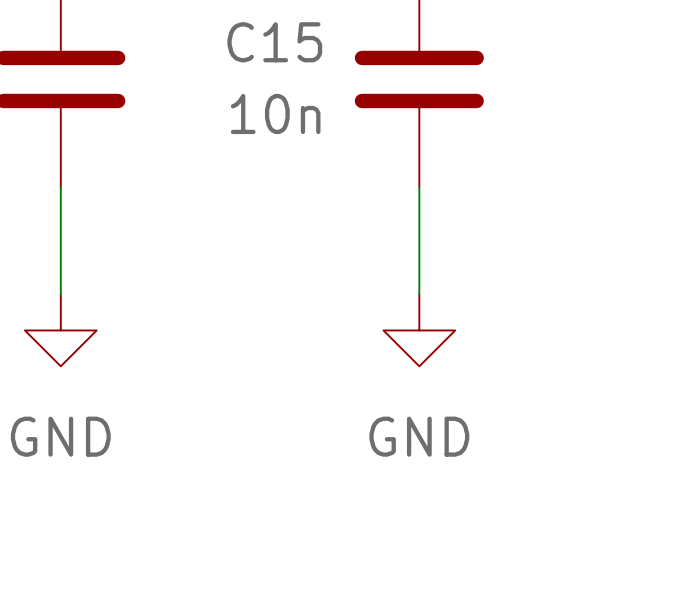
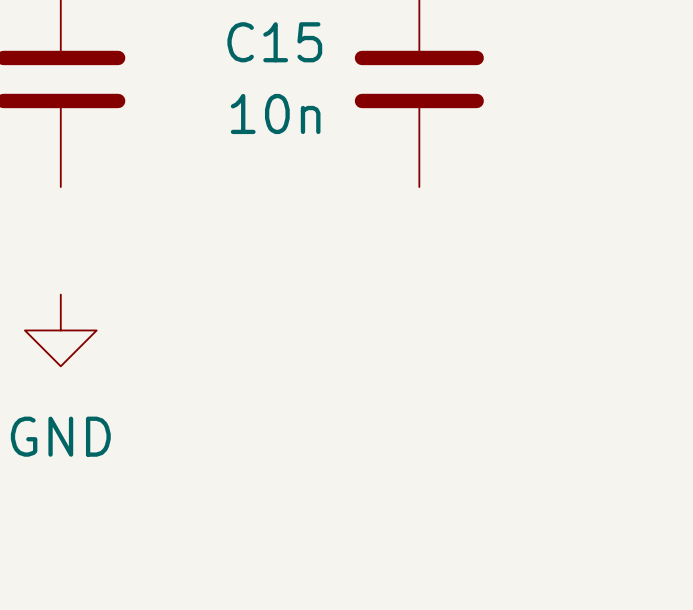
wire: (60, 187) (60, 294) -> none
wire: (419, 187) (419, 294) -> none
power symbol: GND (419, 330) -> none

